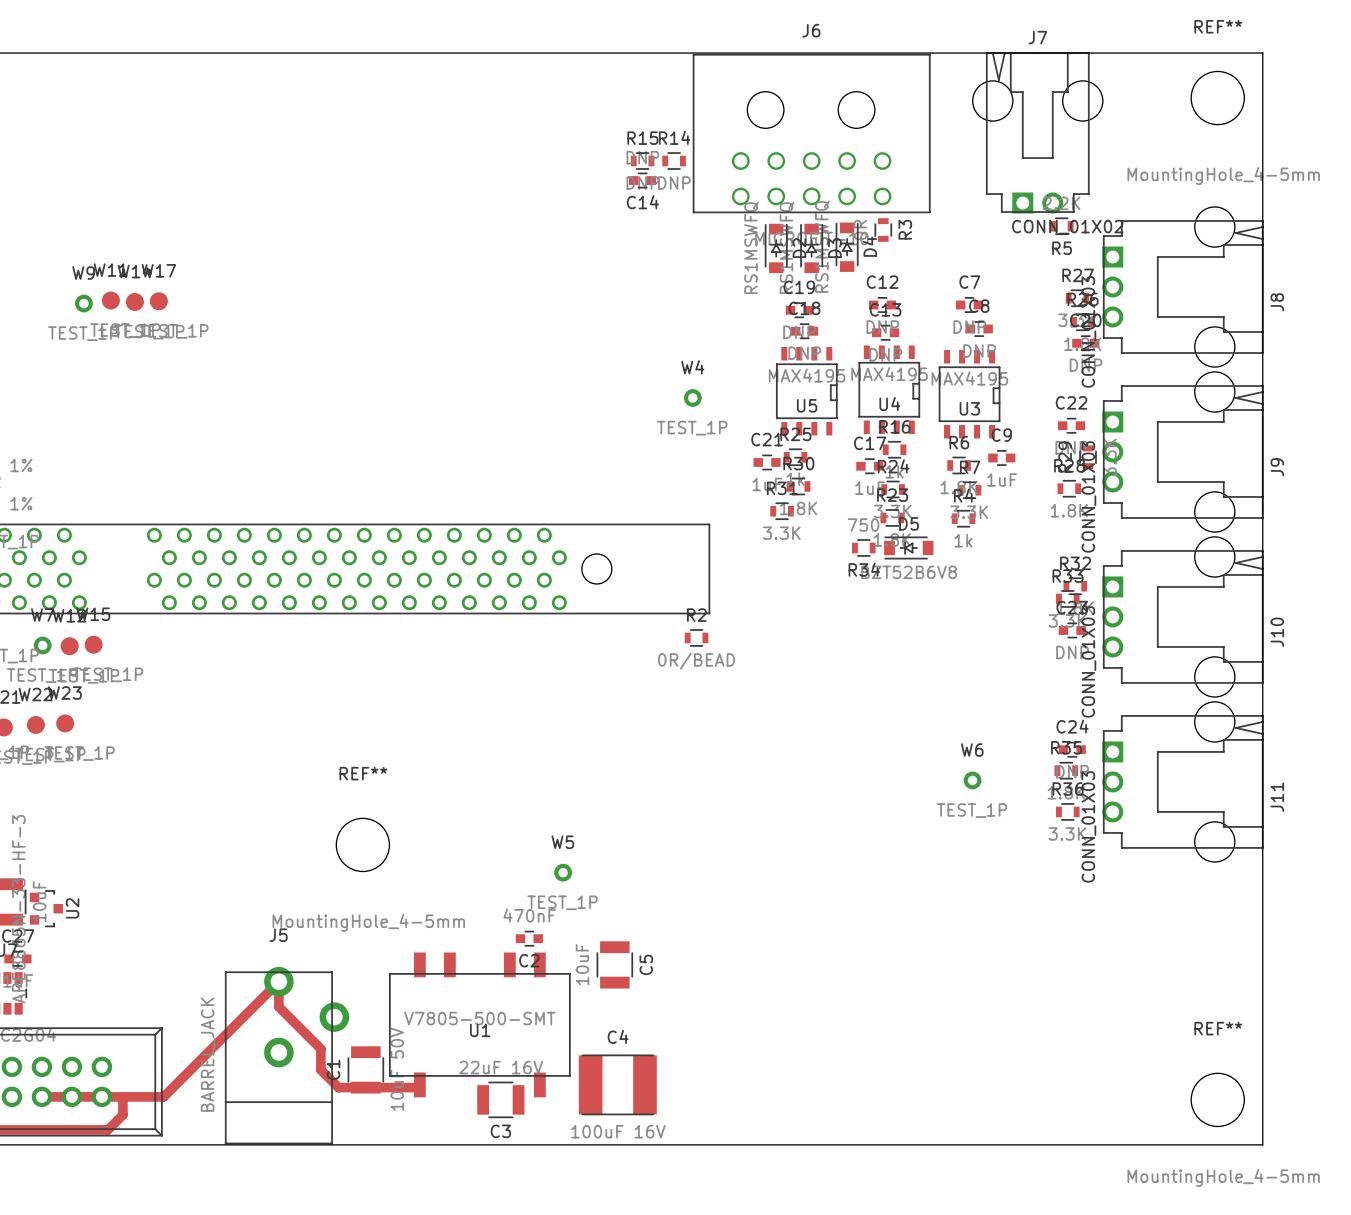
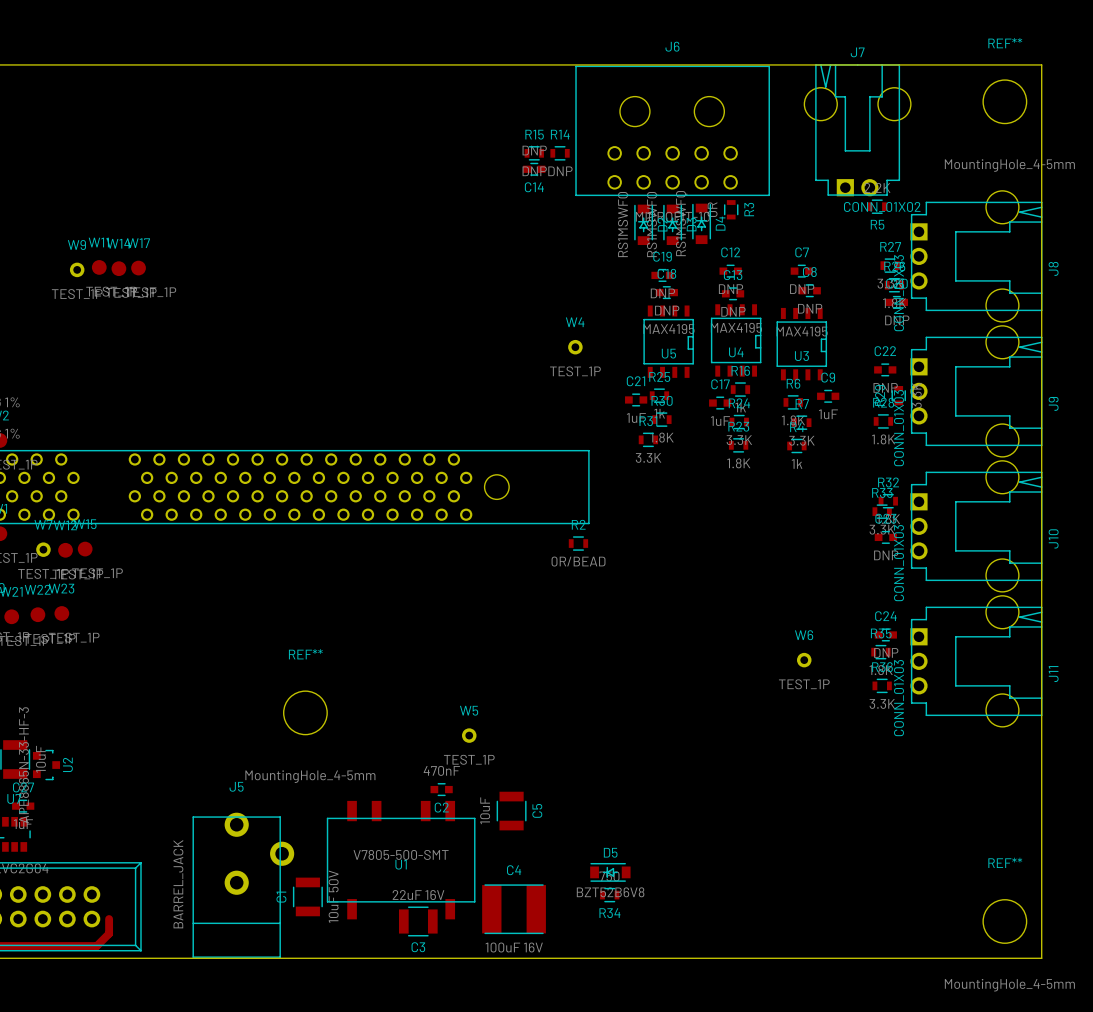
R34 position: (863, 547) -> (609, 895)
D5 position: (908, 547) -> (610, 872)
track: (419, 1084) (417, 1087) (338, 1087) (320, 1069) (320, 1048) (278, 1006) (278, 981) (163, 1096) (41, 1096) -> none

